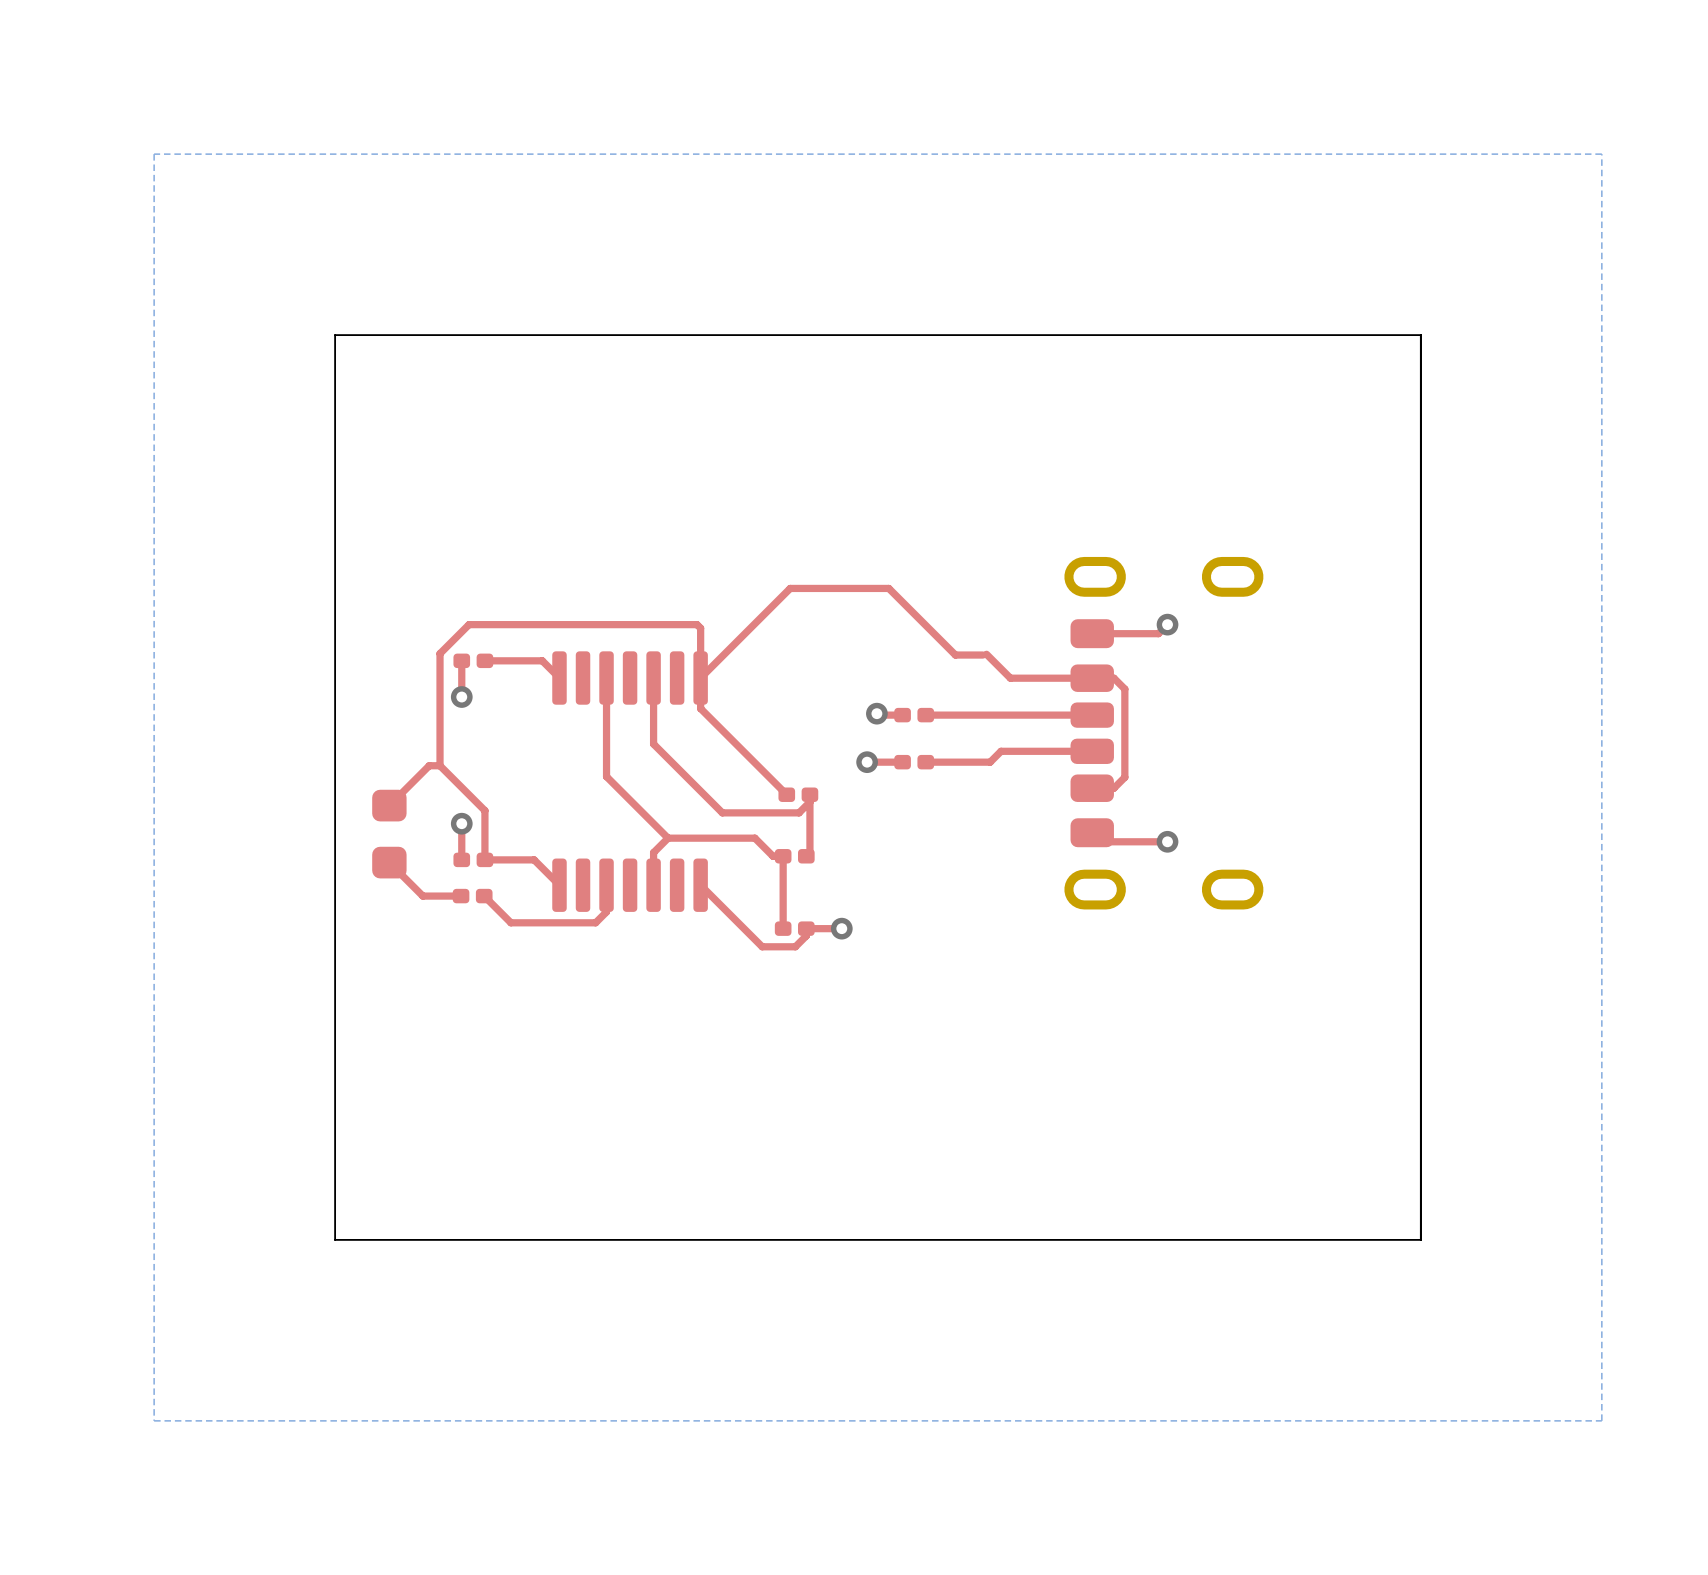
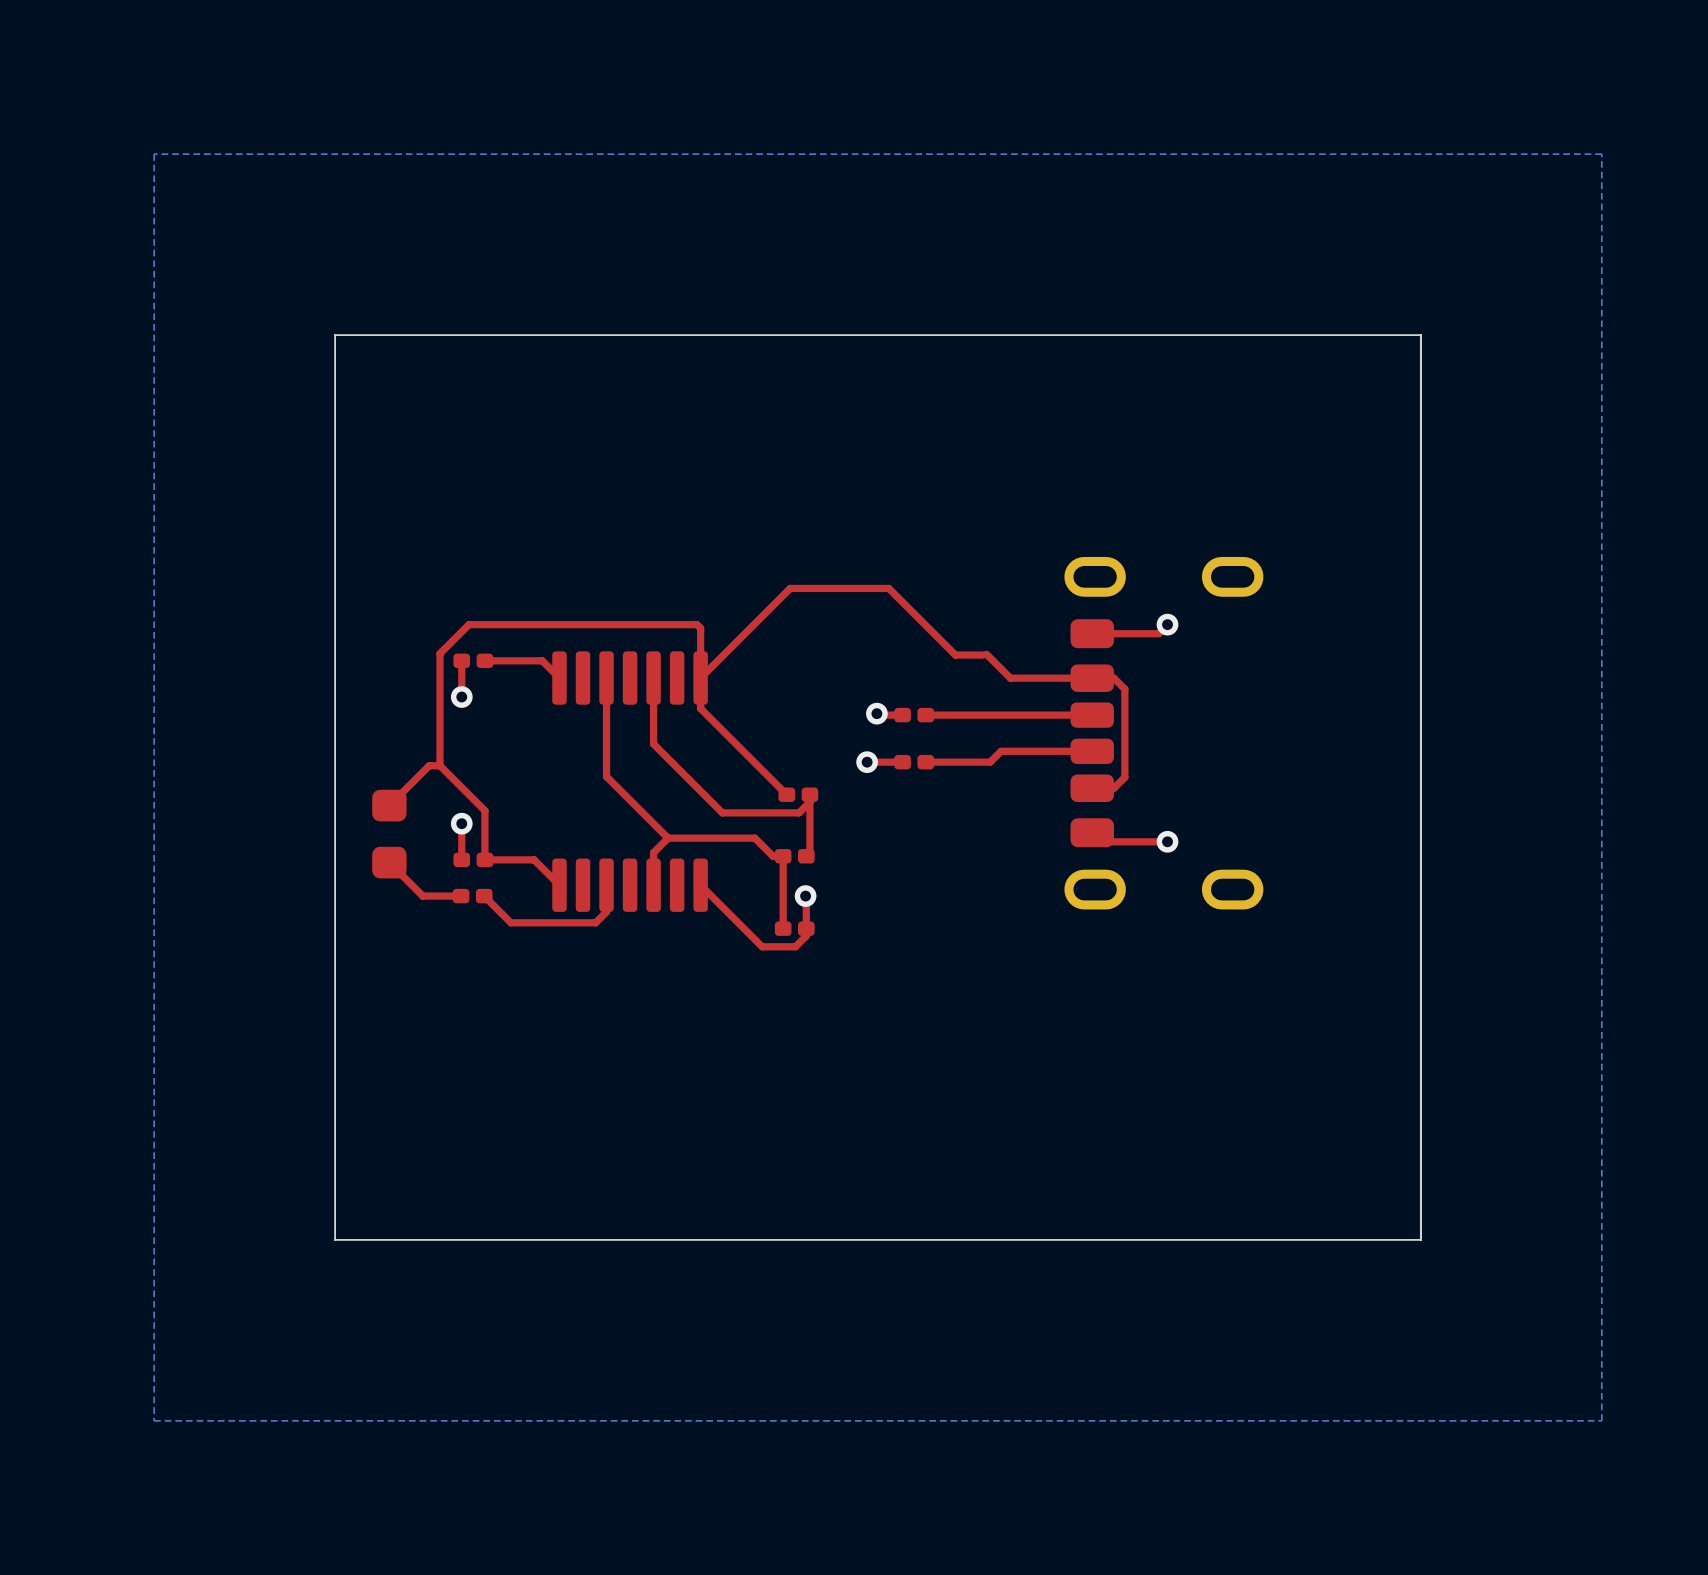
top track: (841, 928) (806, 928) -> (805, 896) (806, 928)
via position: (841, 928) -> (805, 896)

